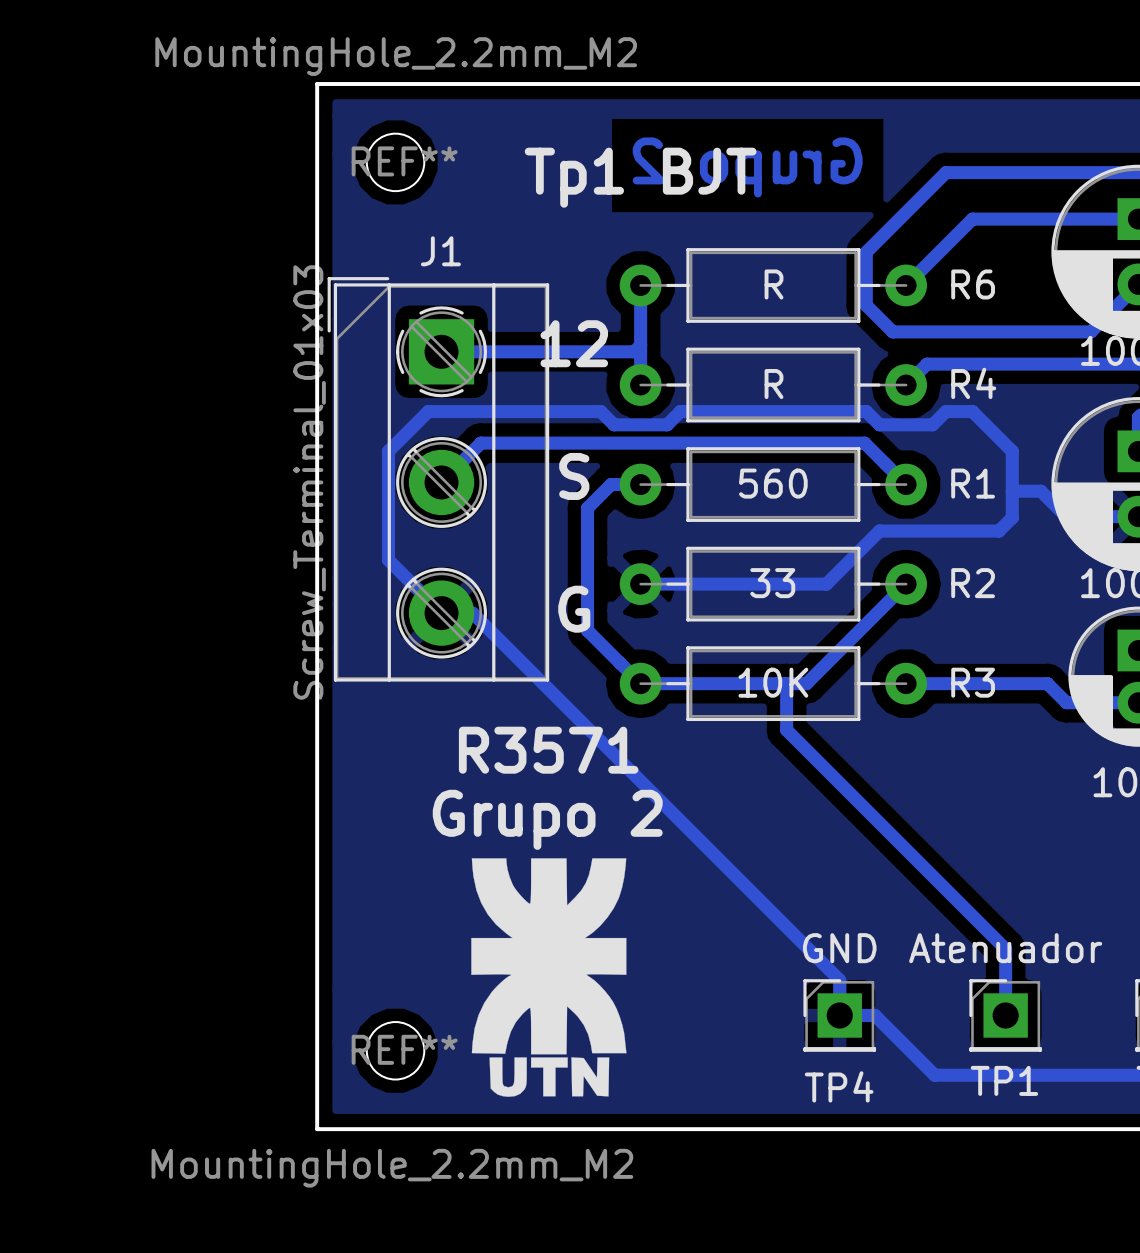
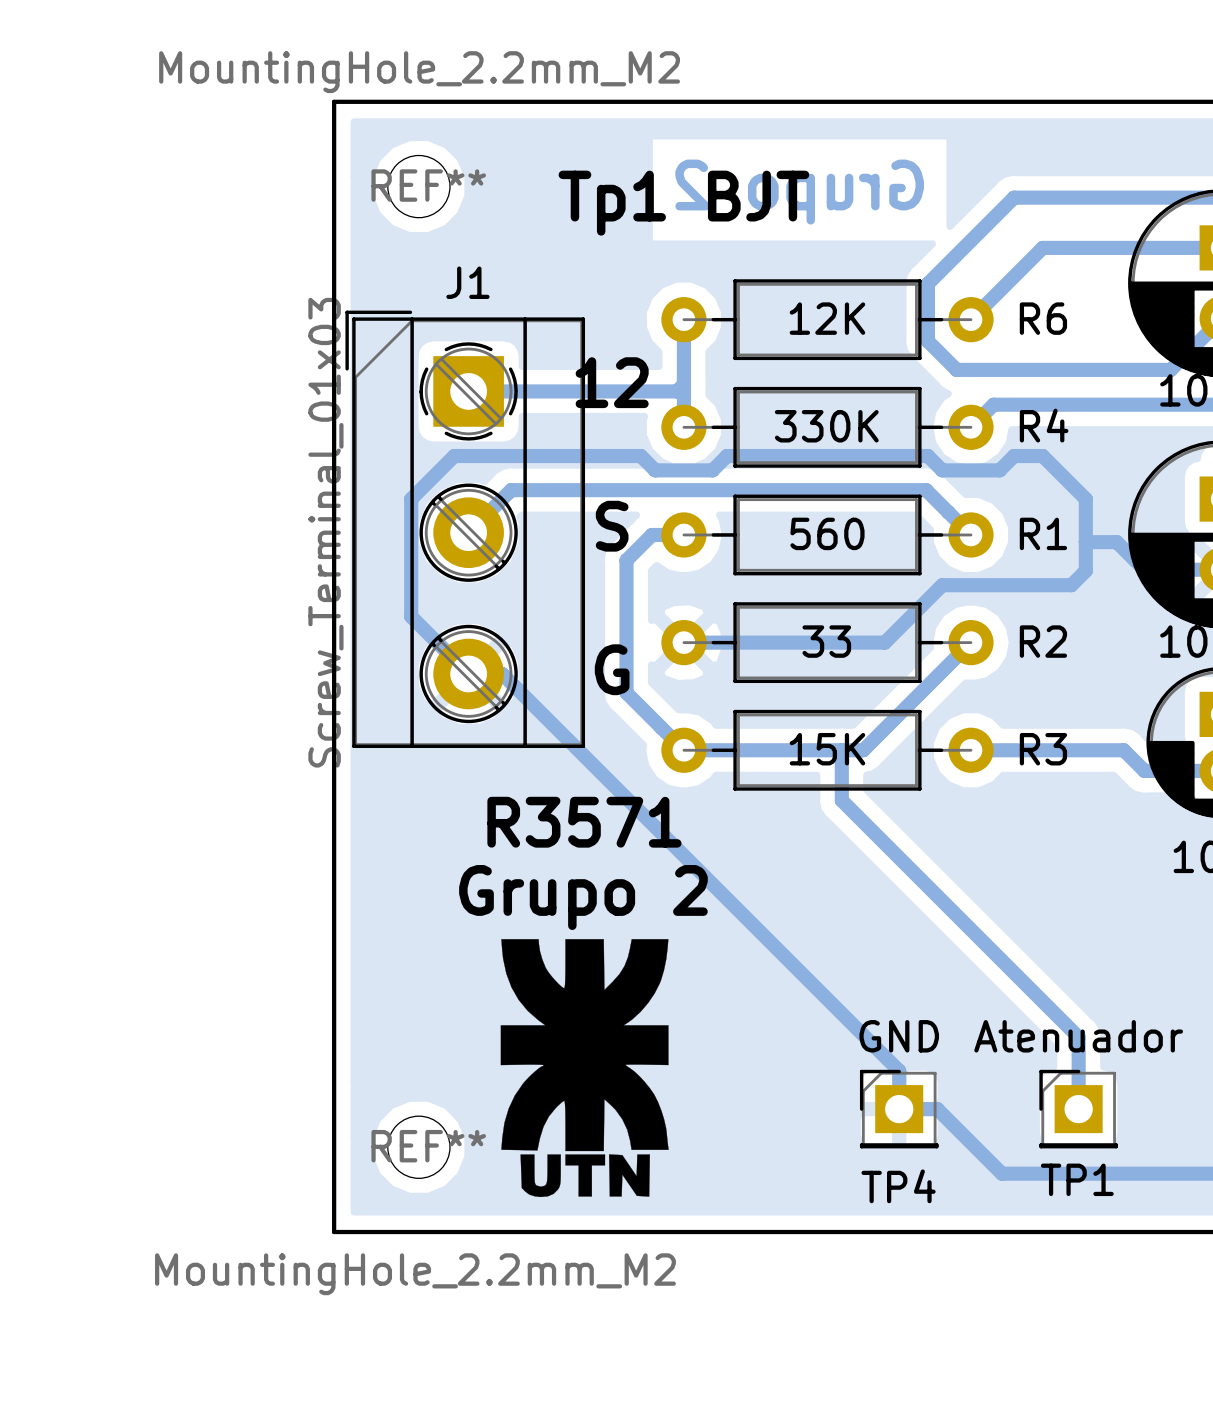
R6 value: R (774, 284) -> 12K (827, 318)
R4 value: R (774, 384) -> 330K (826, 426)
R3 value: 10K (773, 682) -> 15K (827, 749)

